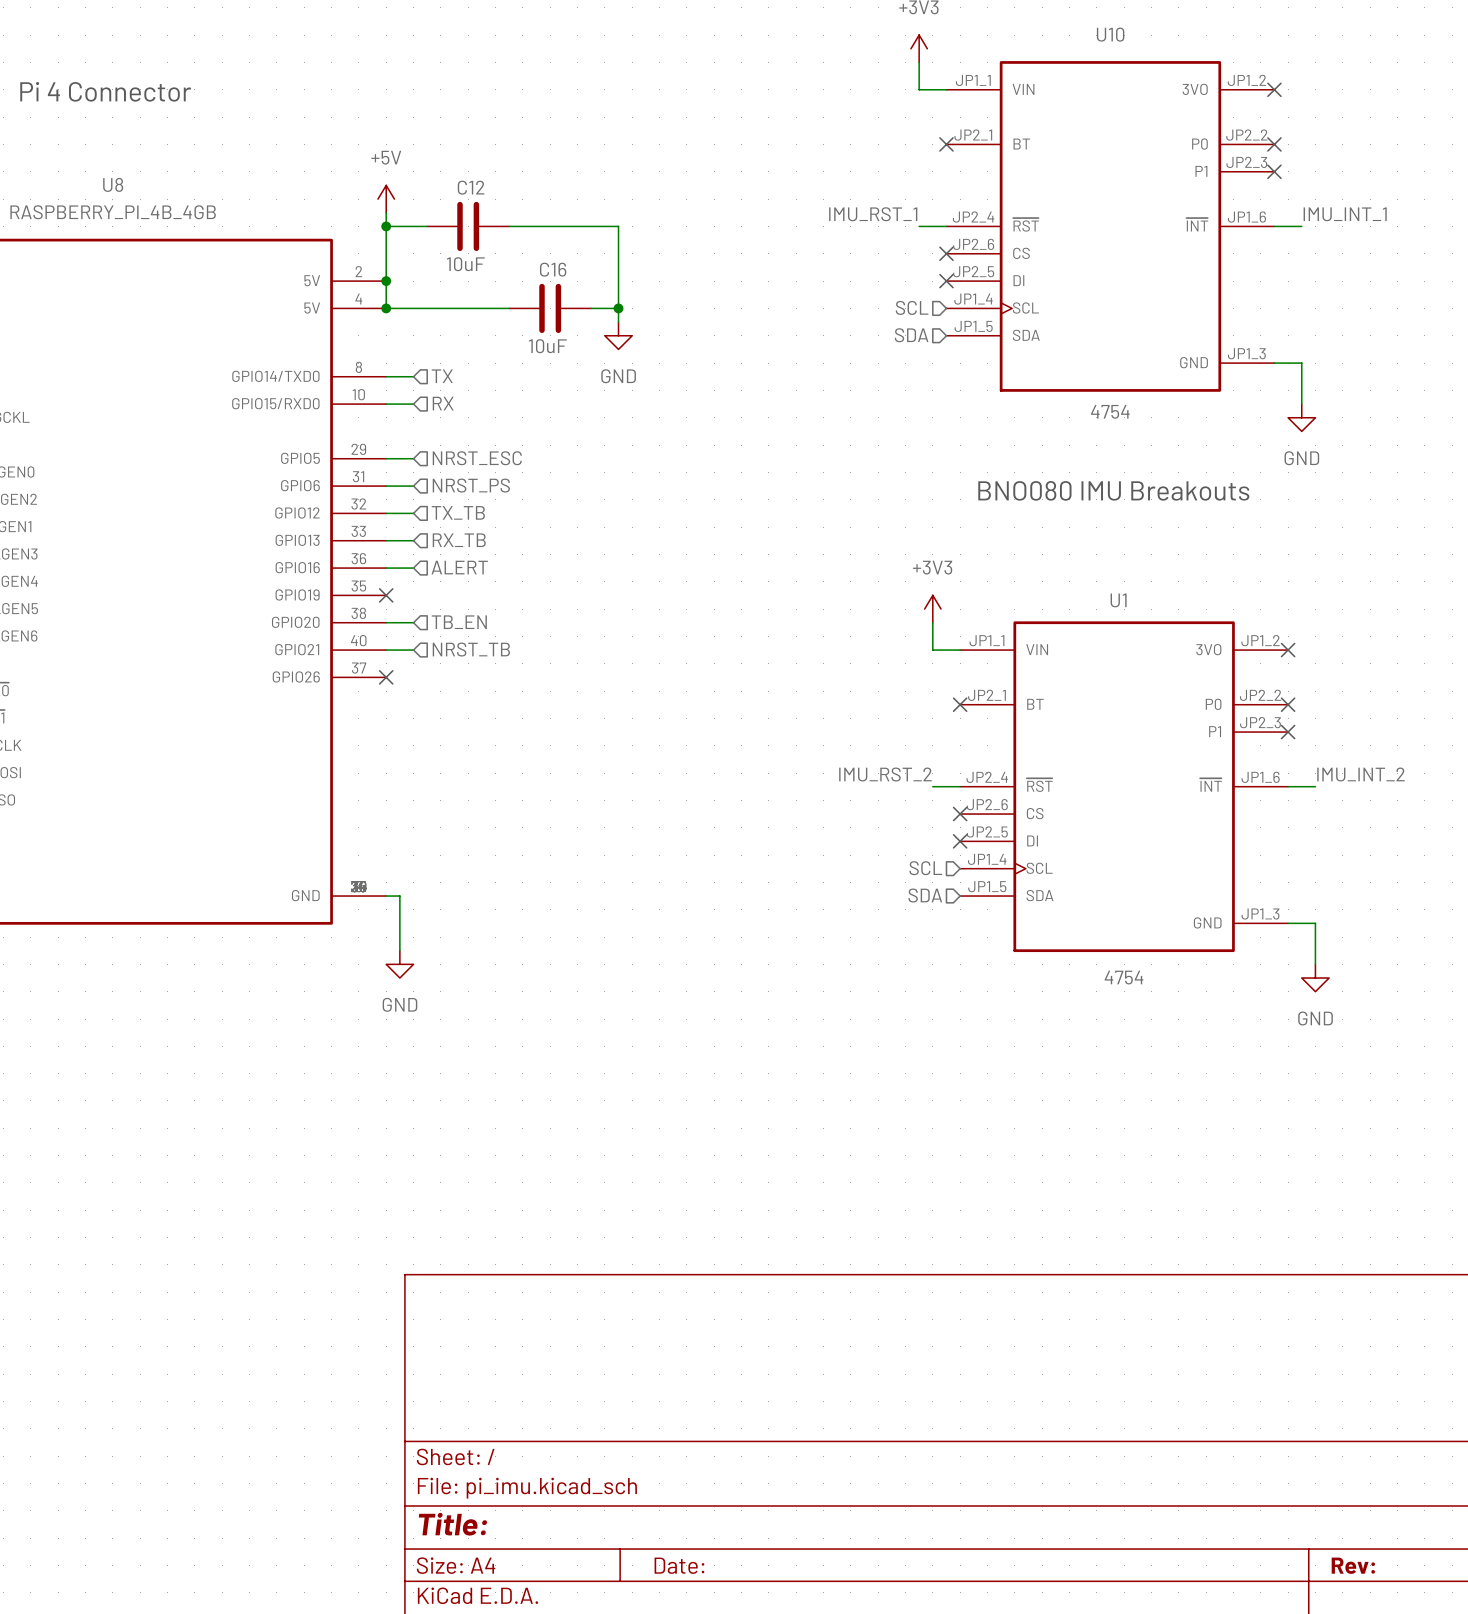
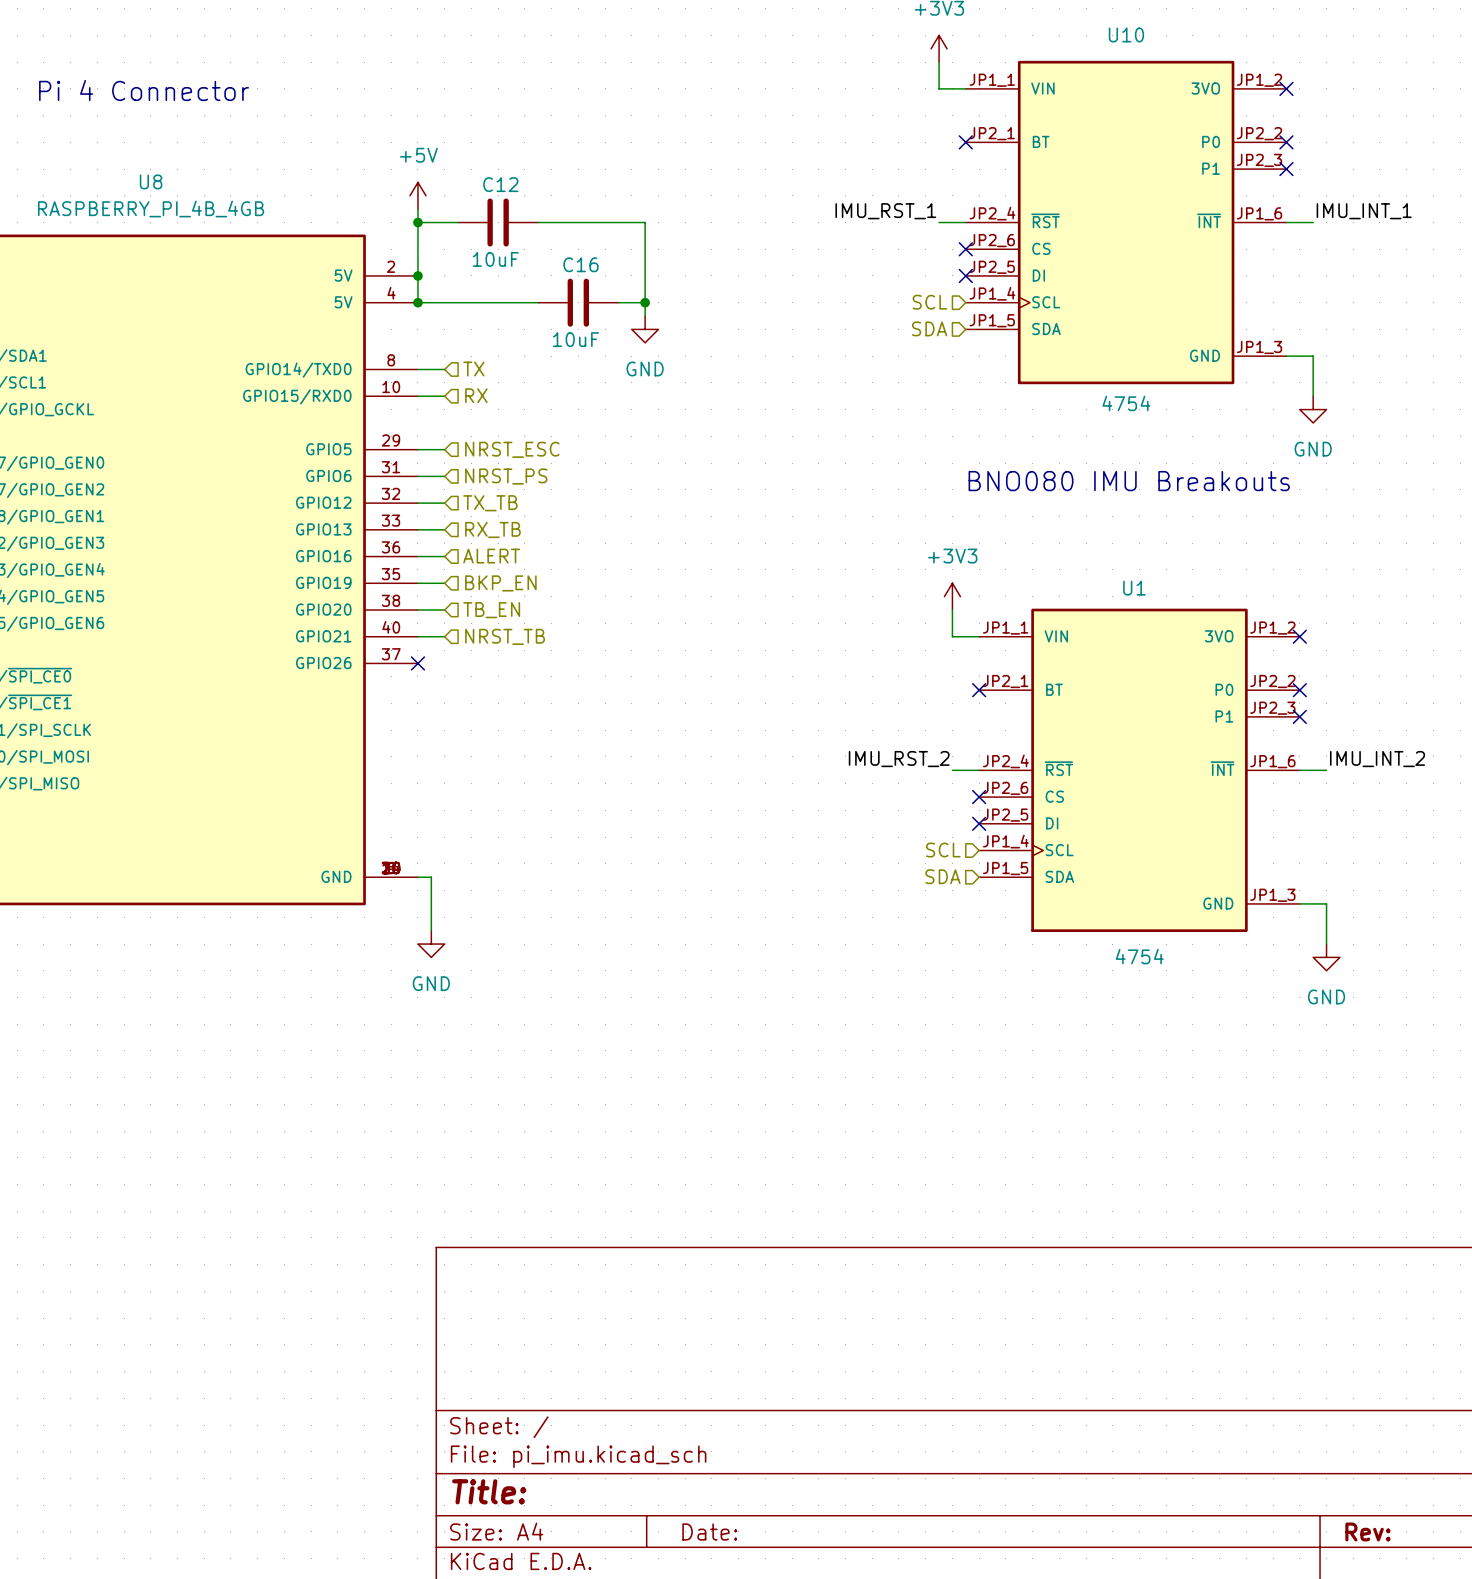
hierarchical label: none -> BKP_EN (500, 583)
wire: none -> (417, 583) (444, 583)
no-connect mark: (386, 595) -> none

